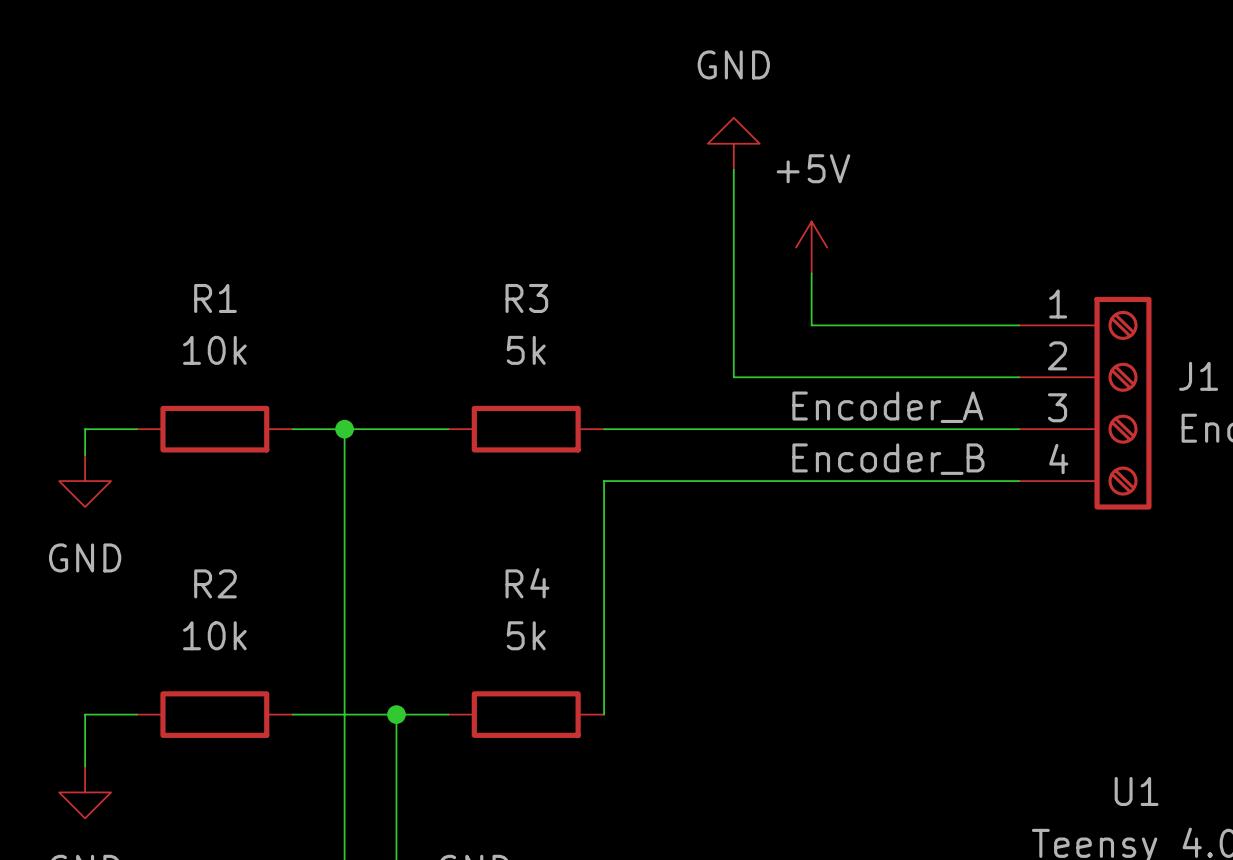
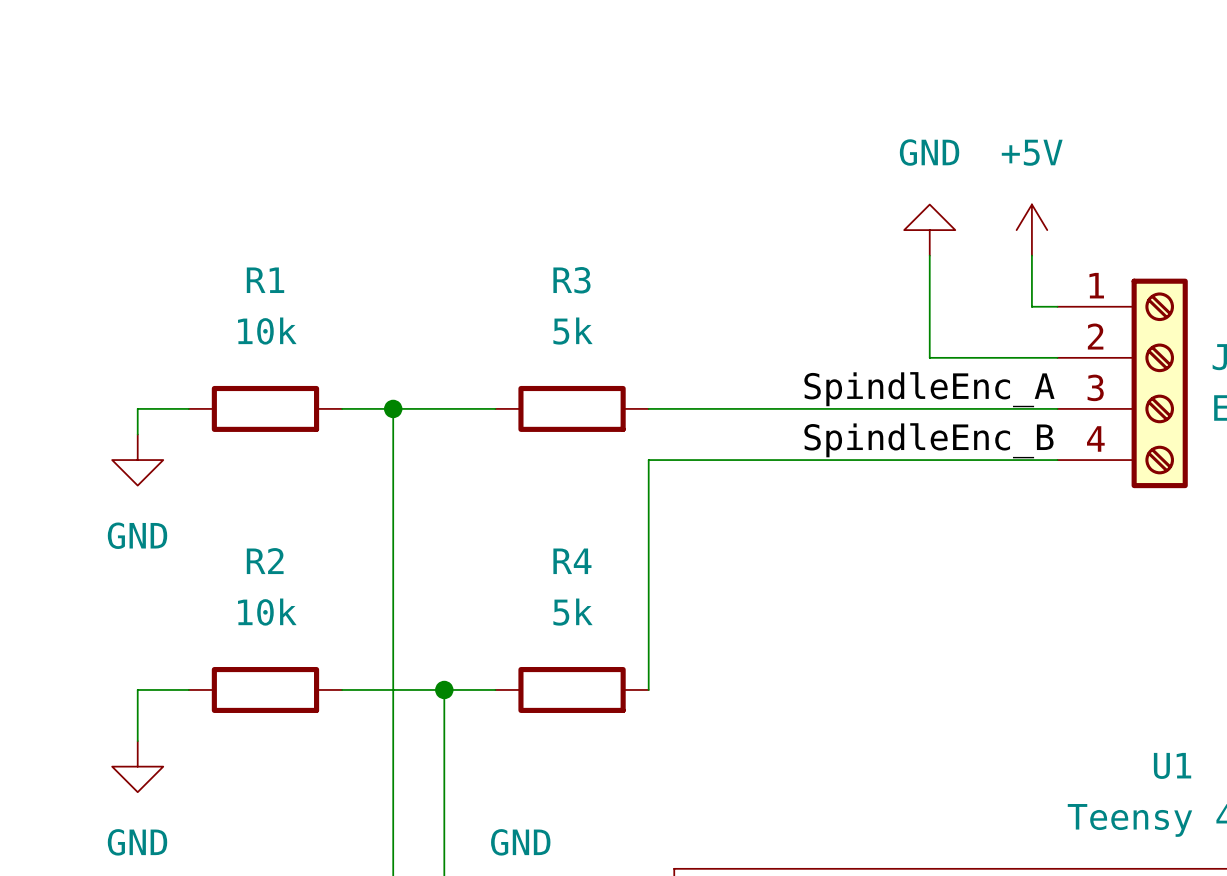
power symbol position: GND (733, 143) -> GND (929, 230)
wire: (733, 169) (733, 377) (889, 377) -> (929, 255) (929, 357)
power symbol position: +5V (811, 247) -> +5V (1031, 230)
wire: (811, 273) (811, 325) (993, 325) -> (1031, 255) (1031, 306)
label: Encoder_A (887, 407) -> none
label: none -> SpindleEnc_A (929, 389)
label: Encoder_B (888, 459) -> none
label: none -> SpindleEnc_B (928, 440)

